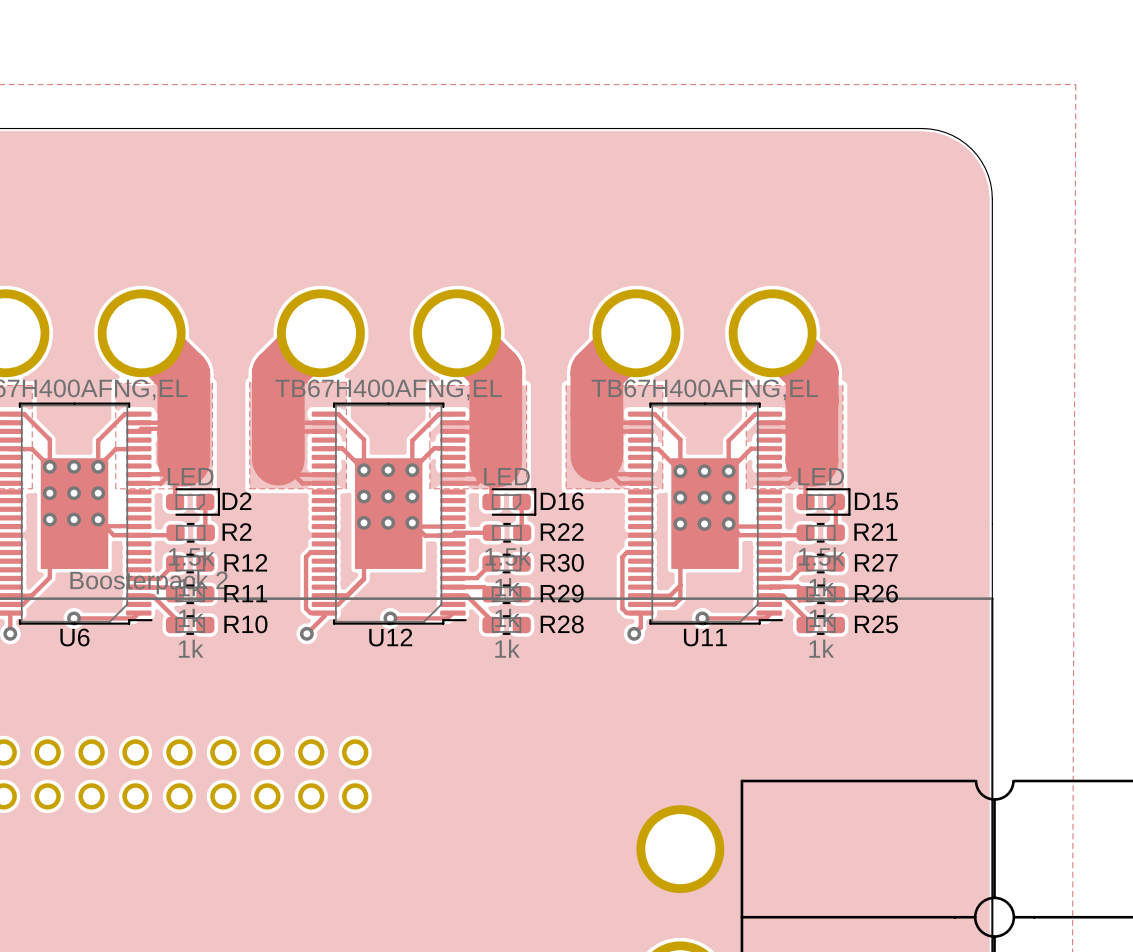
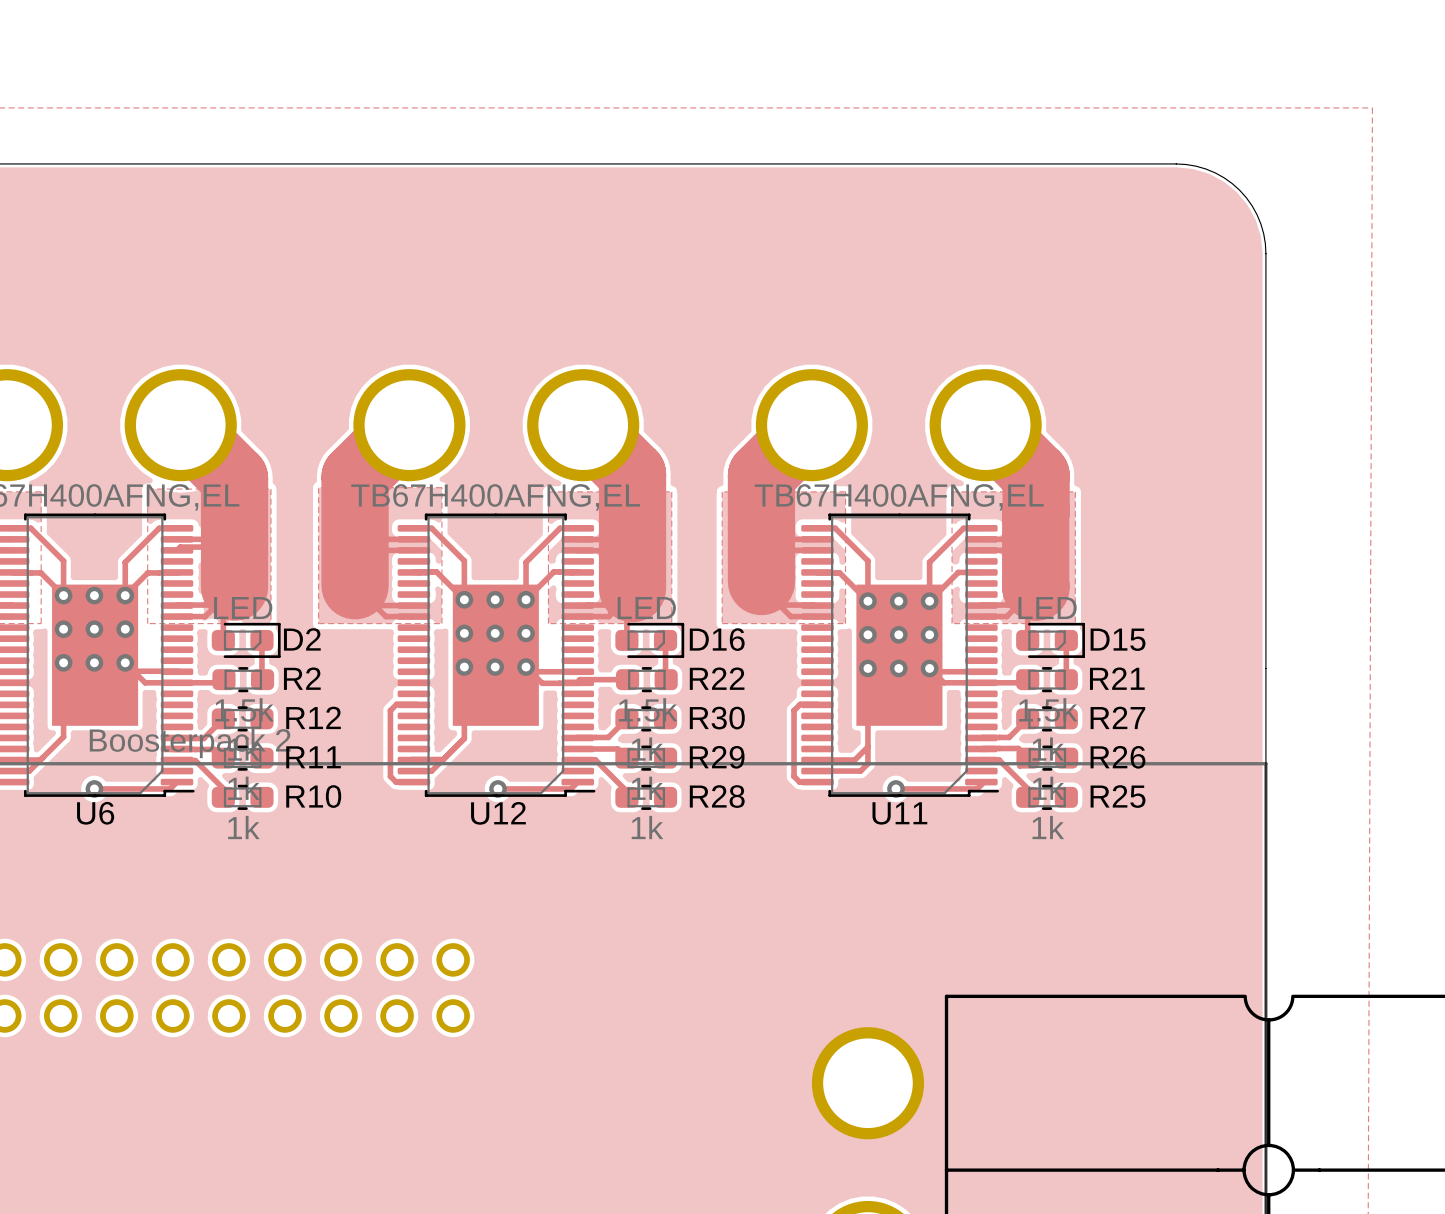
track: (10, 613) (10, 633) -> none
track: (324, 613) (324, 616) (306, 633) -> none
track: (640, 614) (640, 627) (634, 633) -> none
via: (10, 633) -> none
via: (306, 633) -> none
via: (634, 633) -> none

